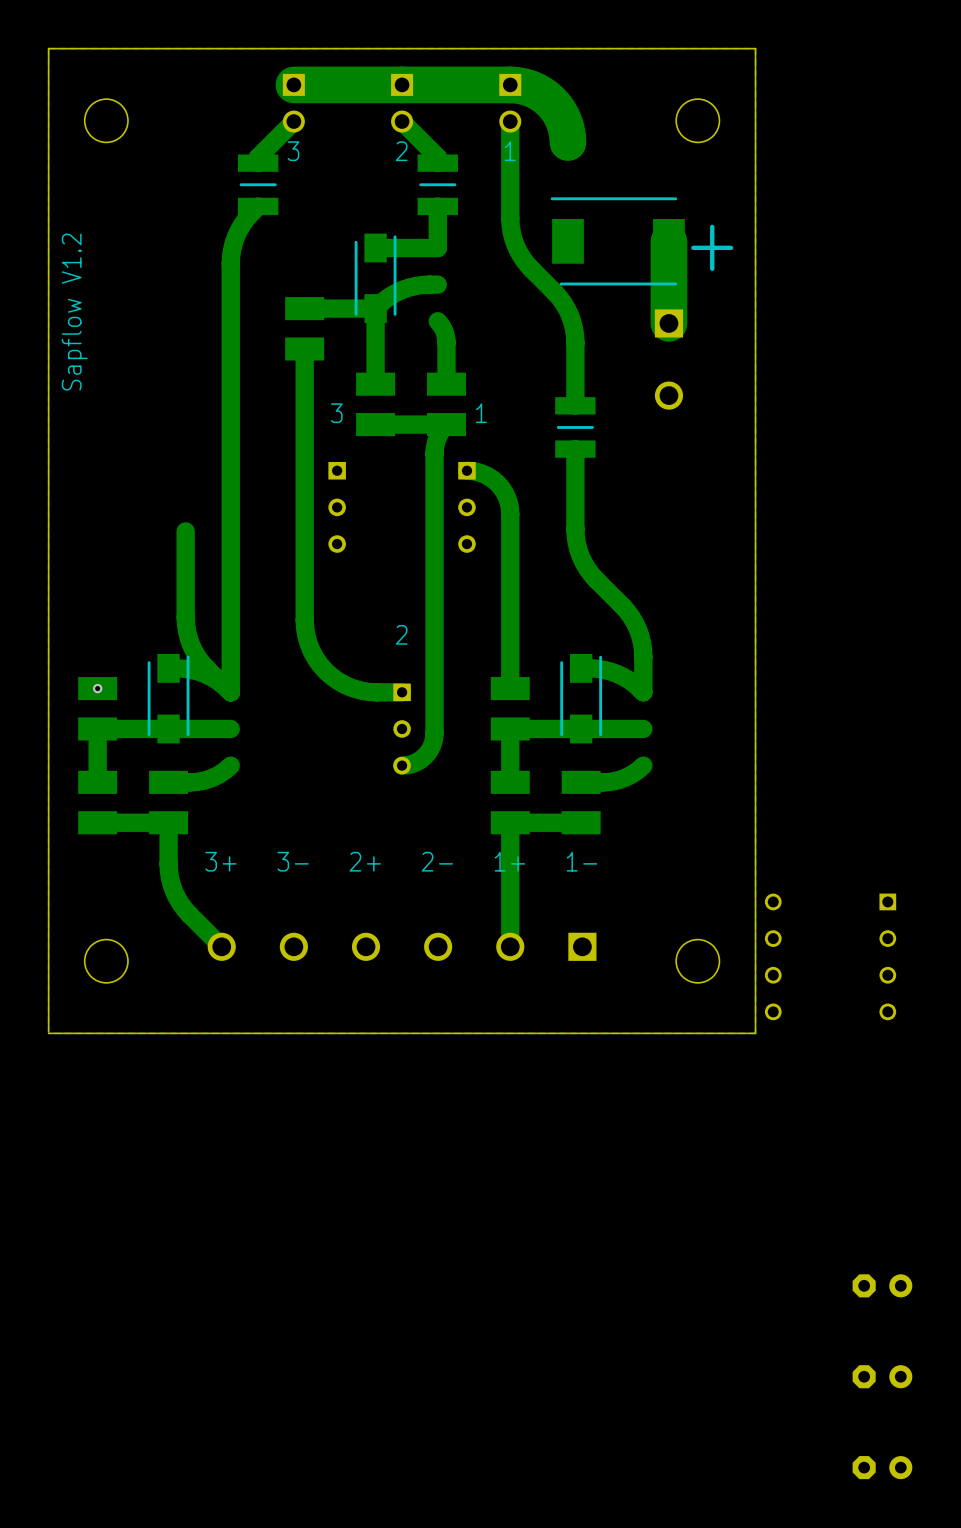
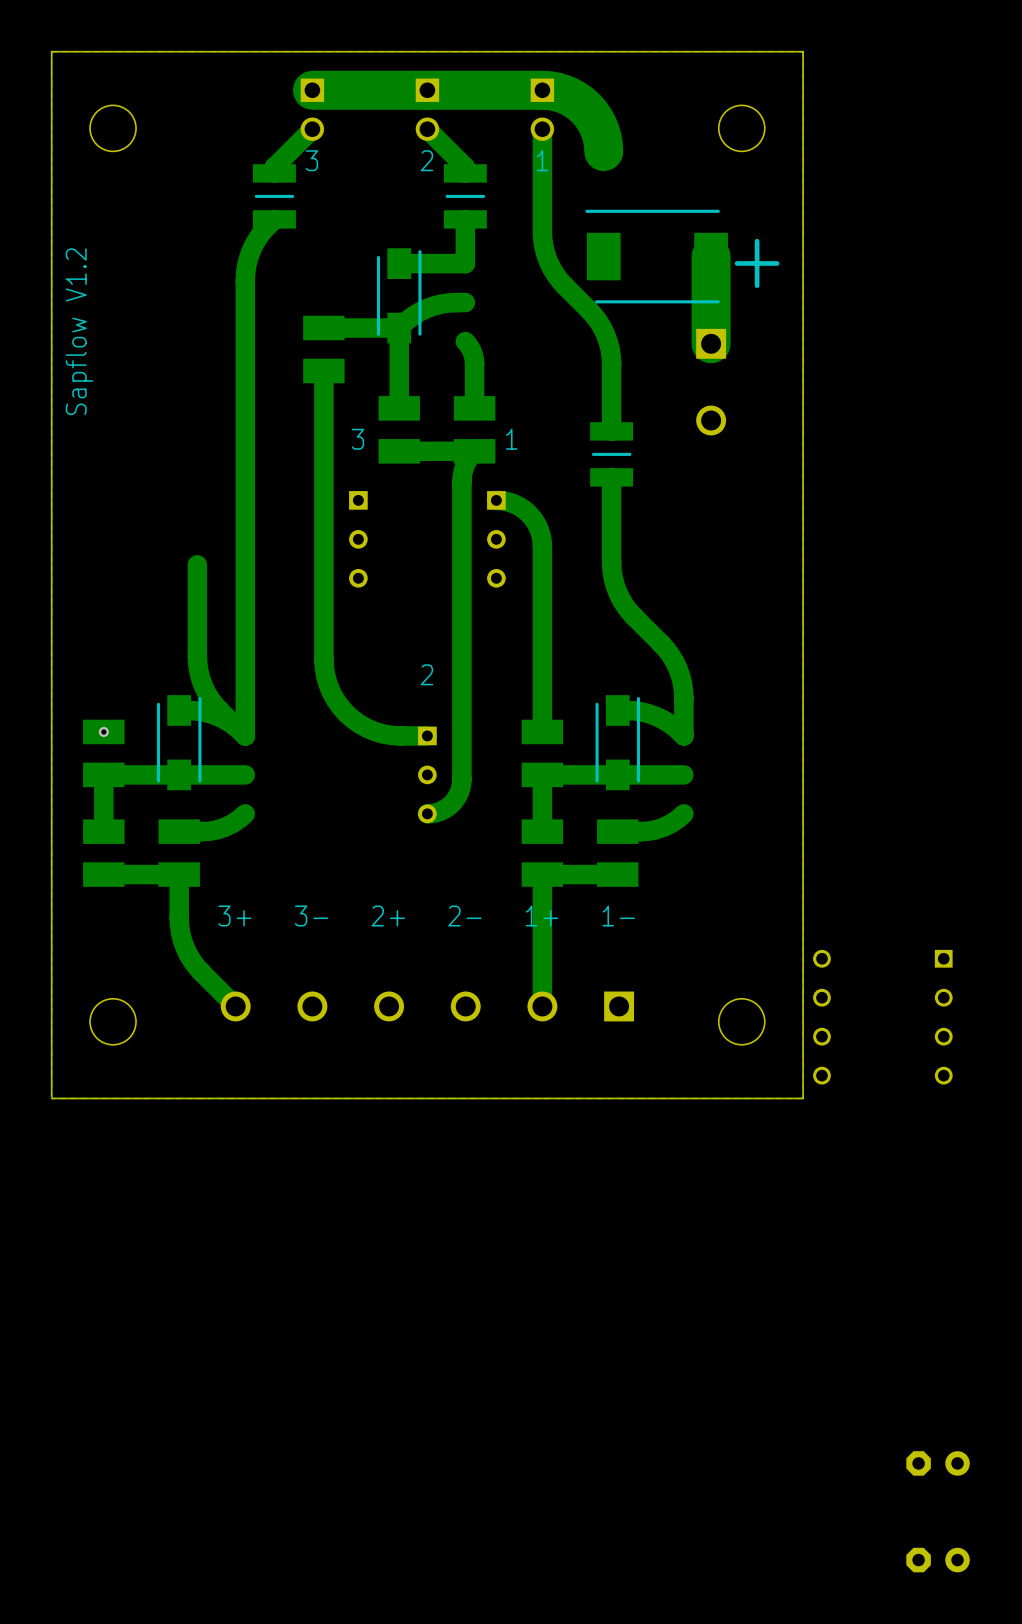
part: (882, 1285) -> none

